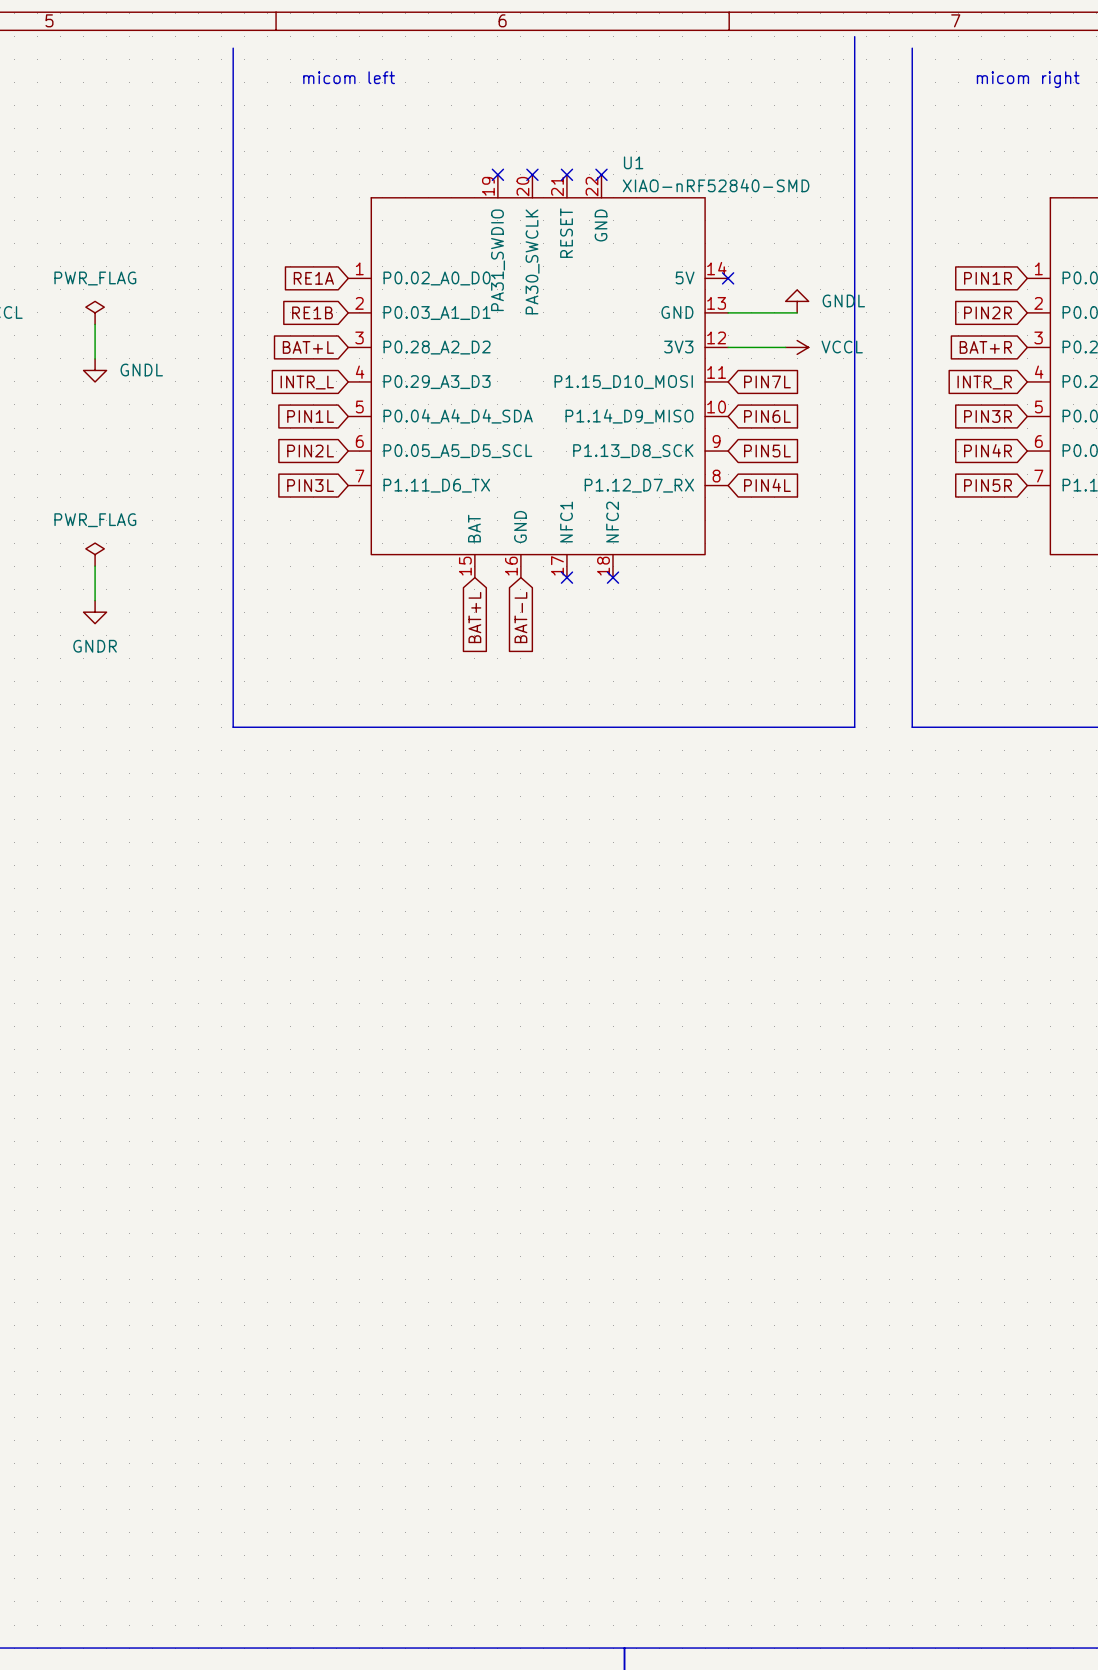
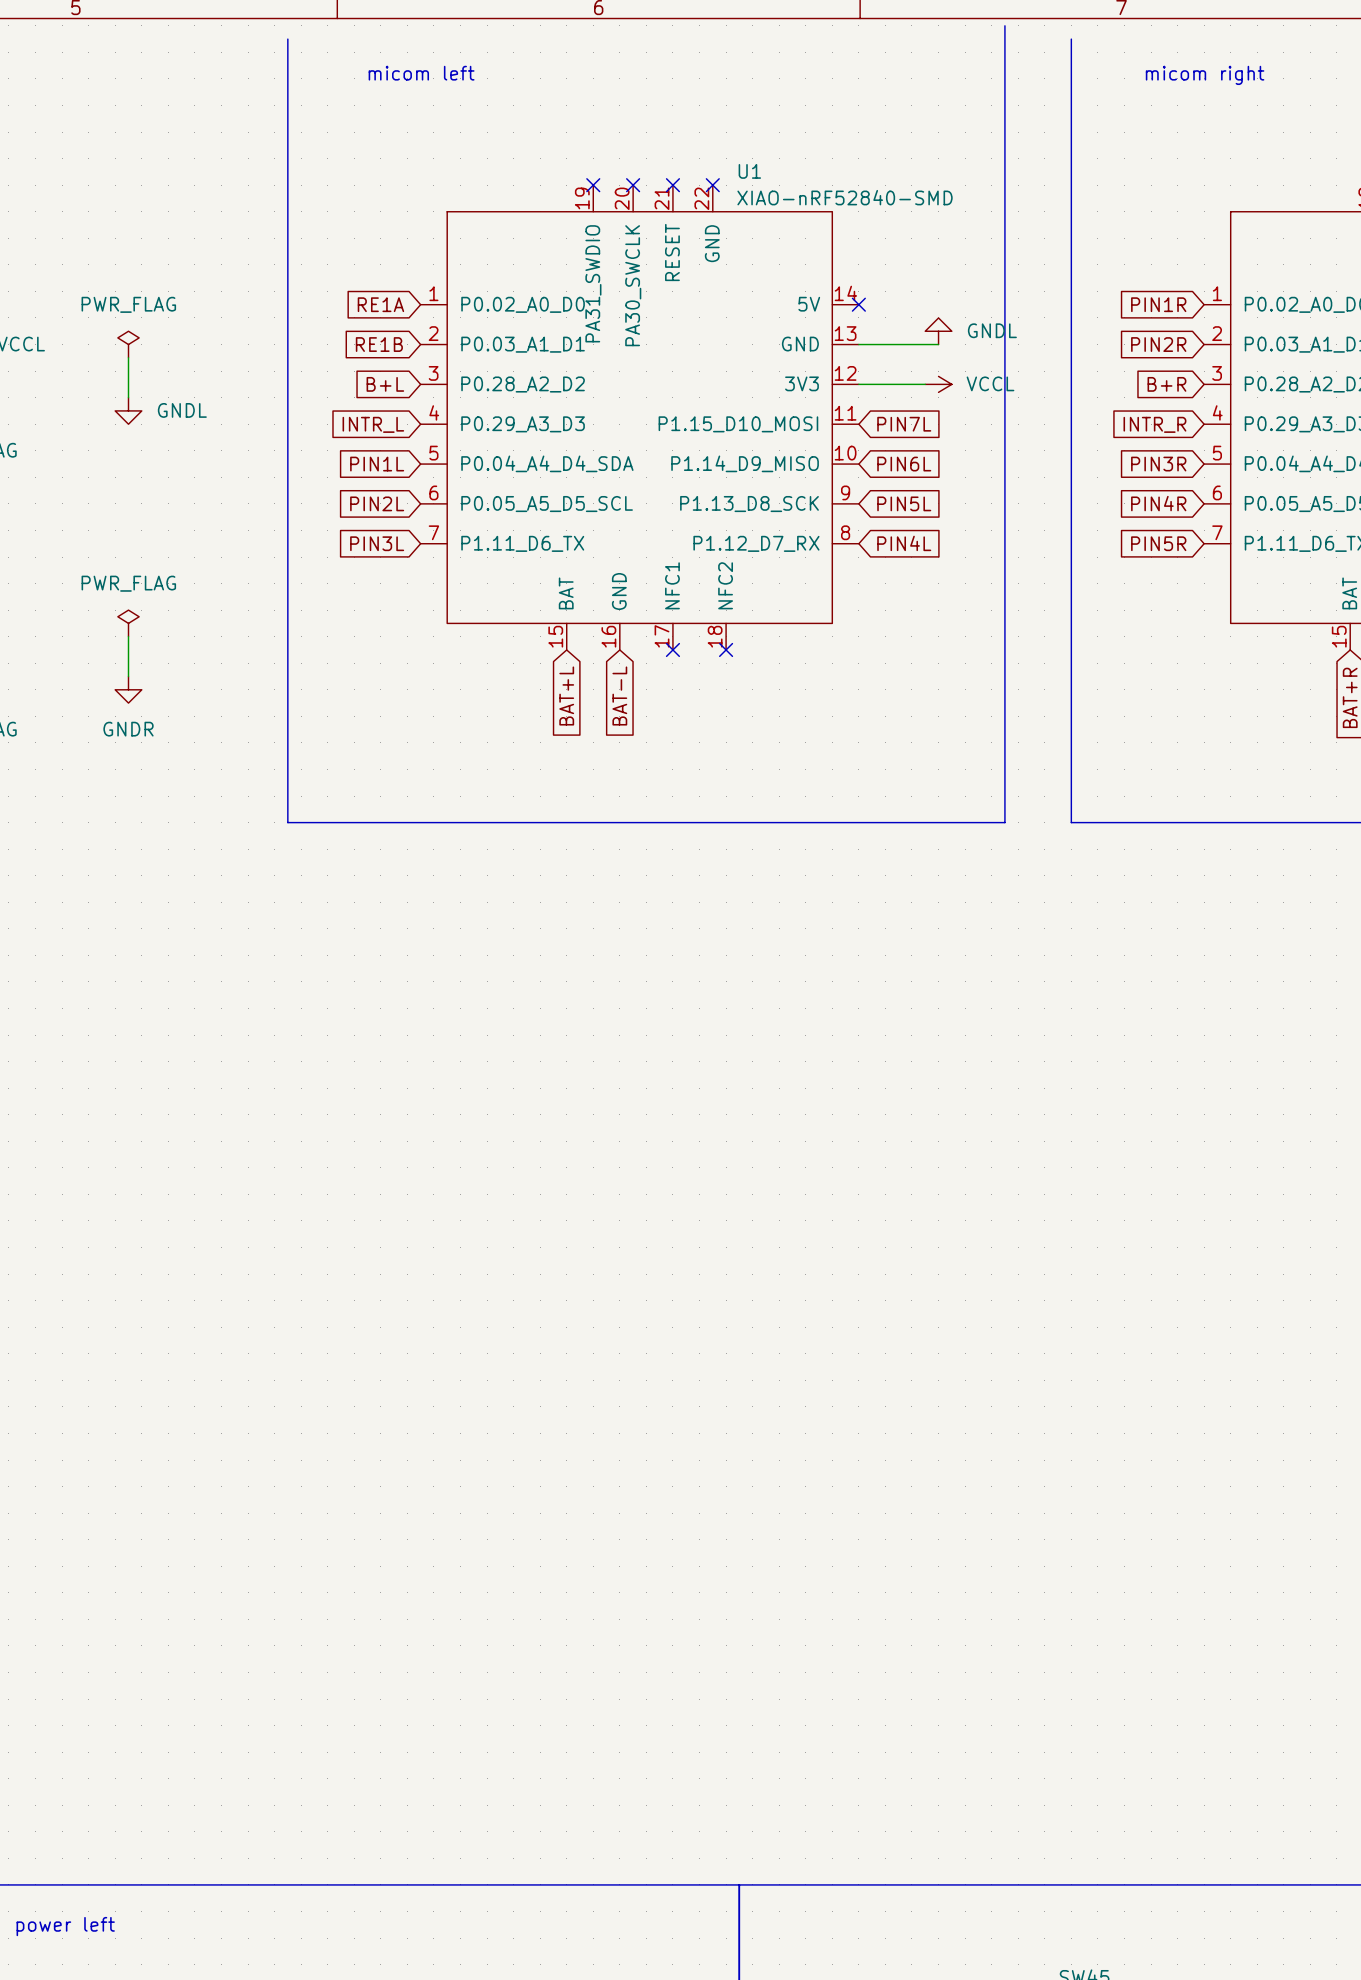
global label: BAT+L (308, 347) -> B+L (385, 384)
global label: BAT+R (985, 347) -> B+R (1166, 384)

